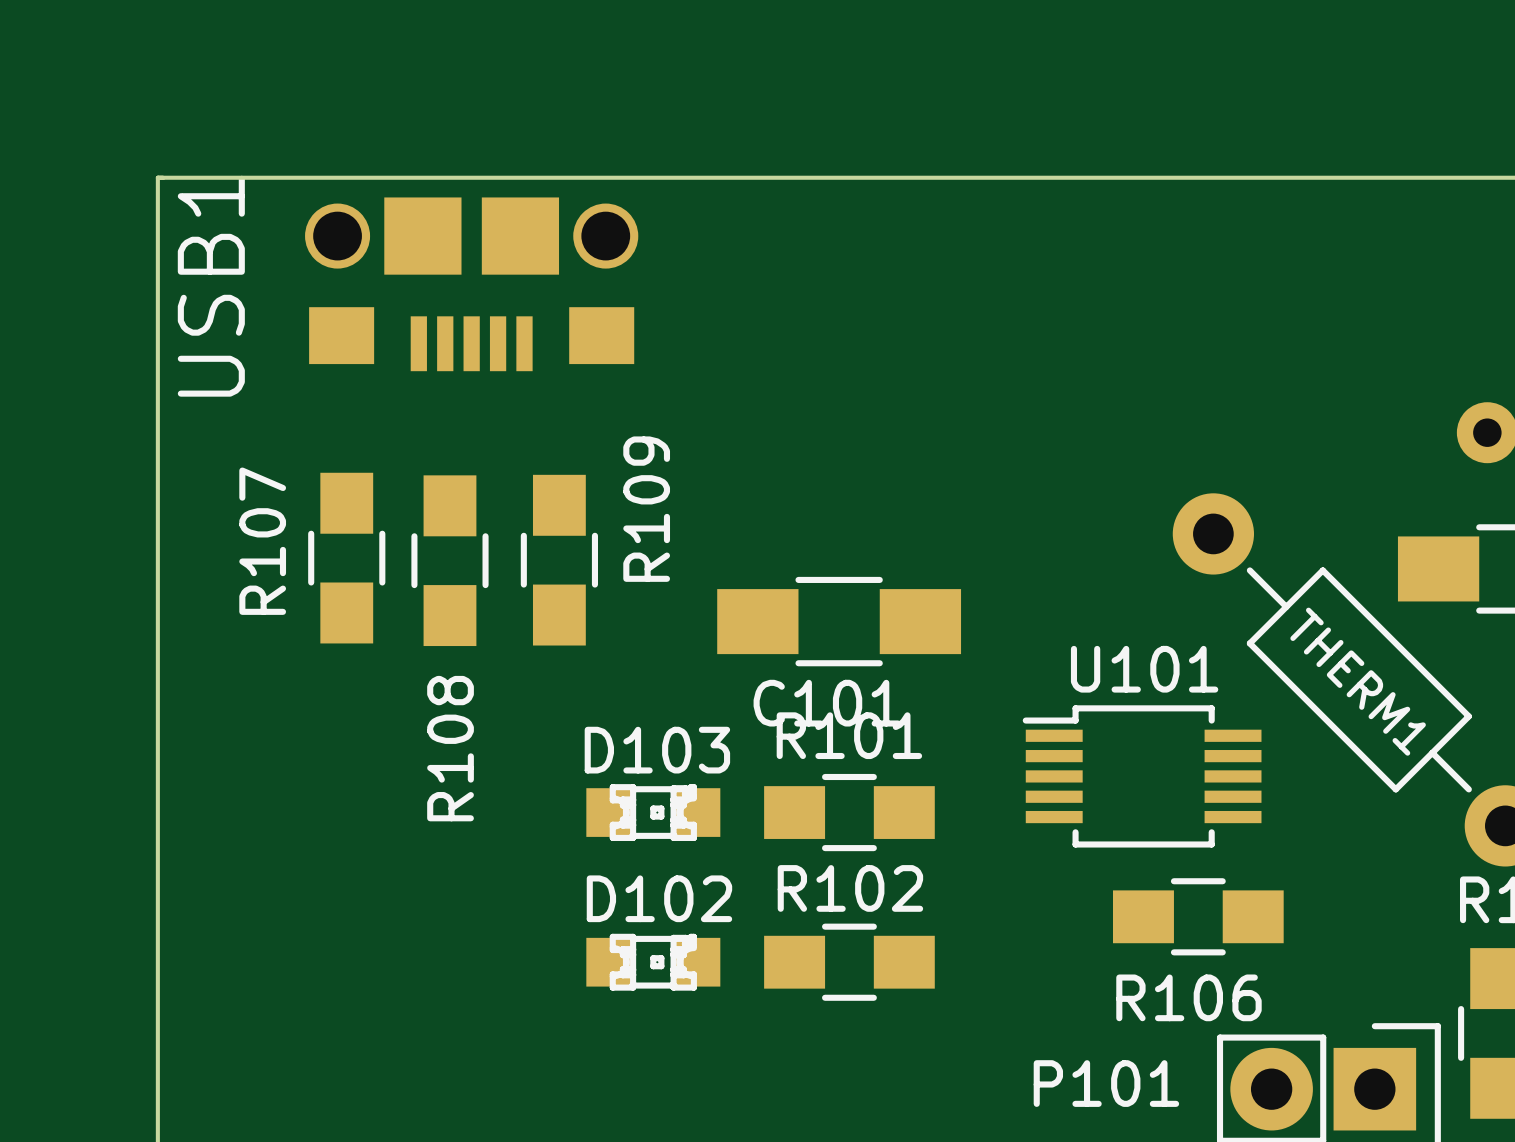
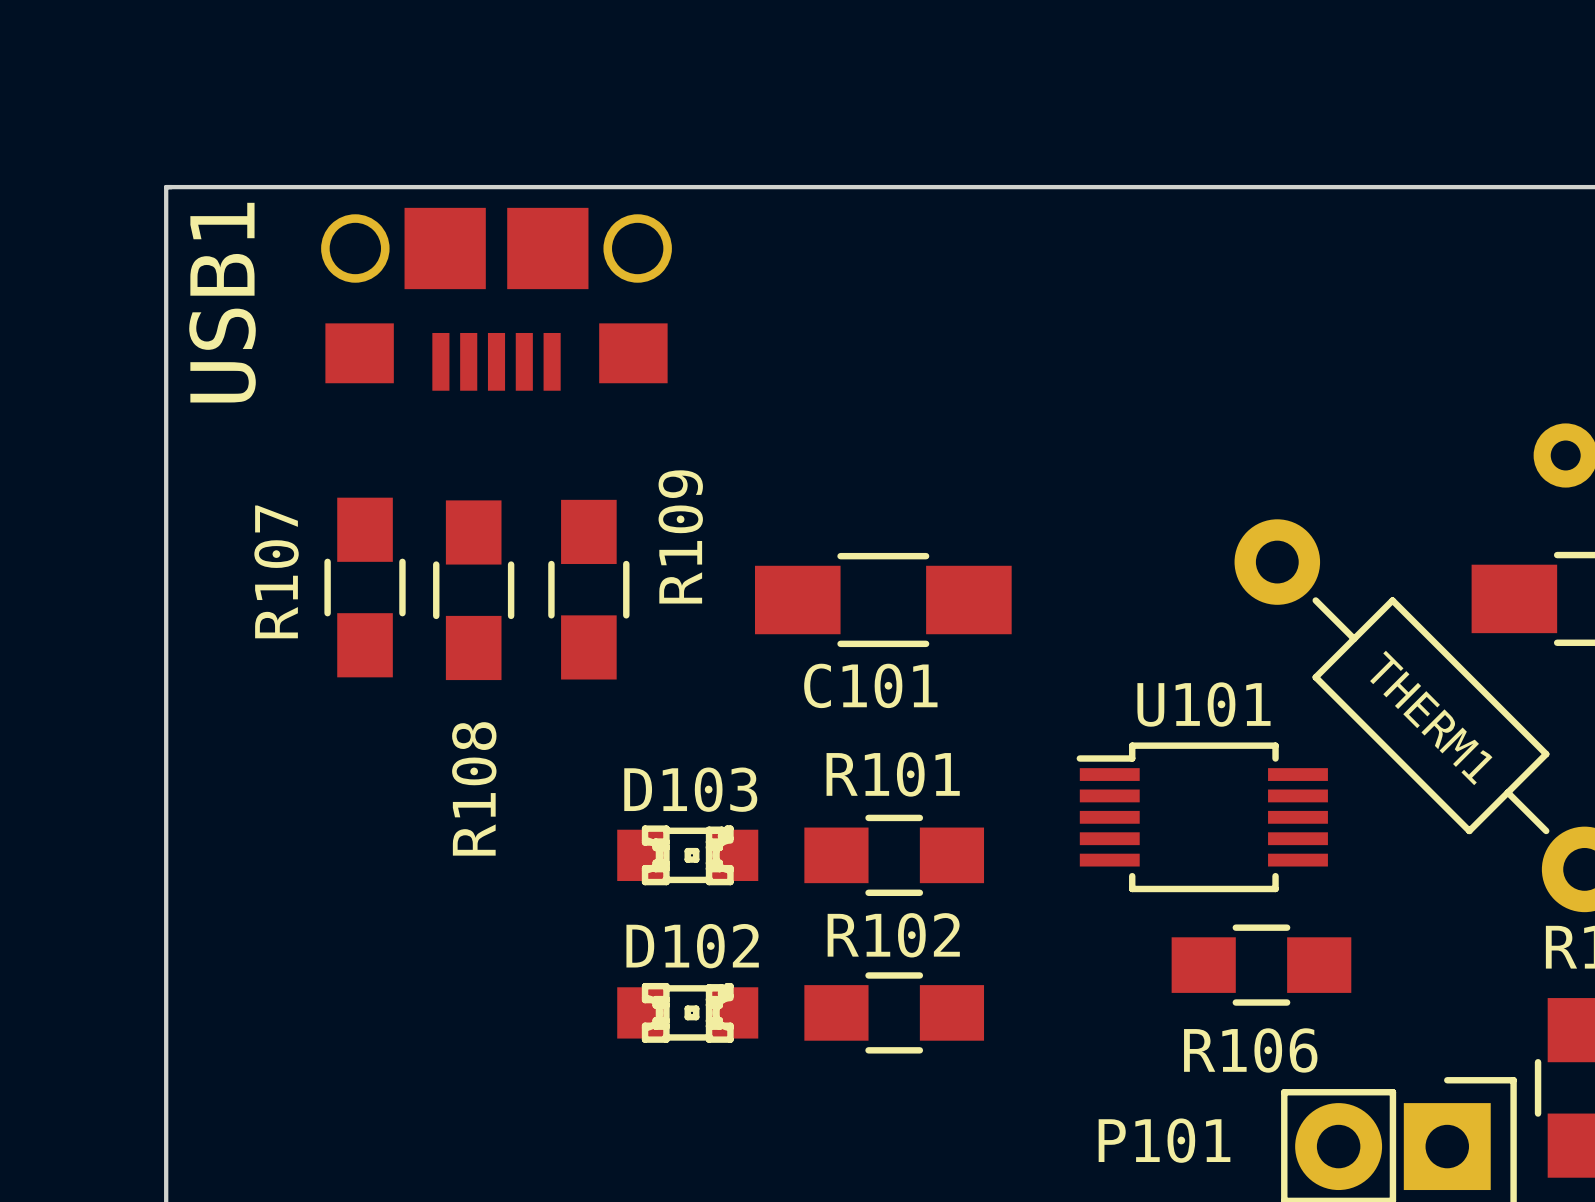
C101 position: (839, 621) -> (883, 600)

